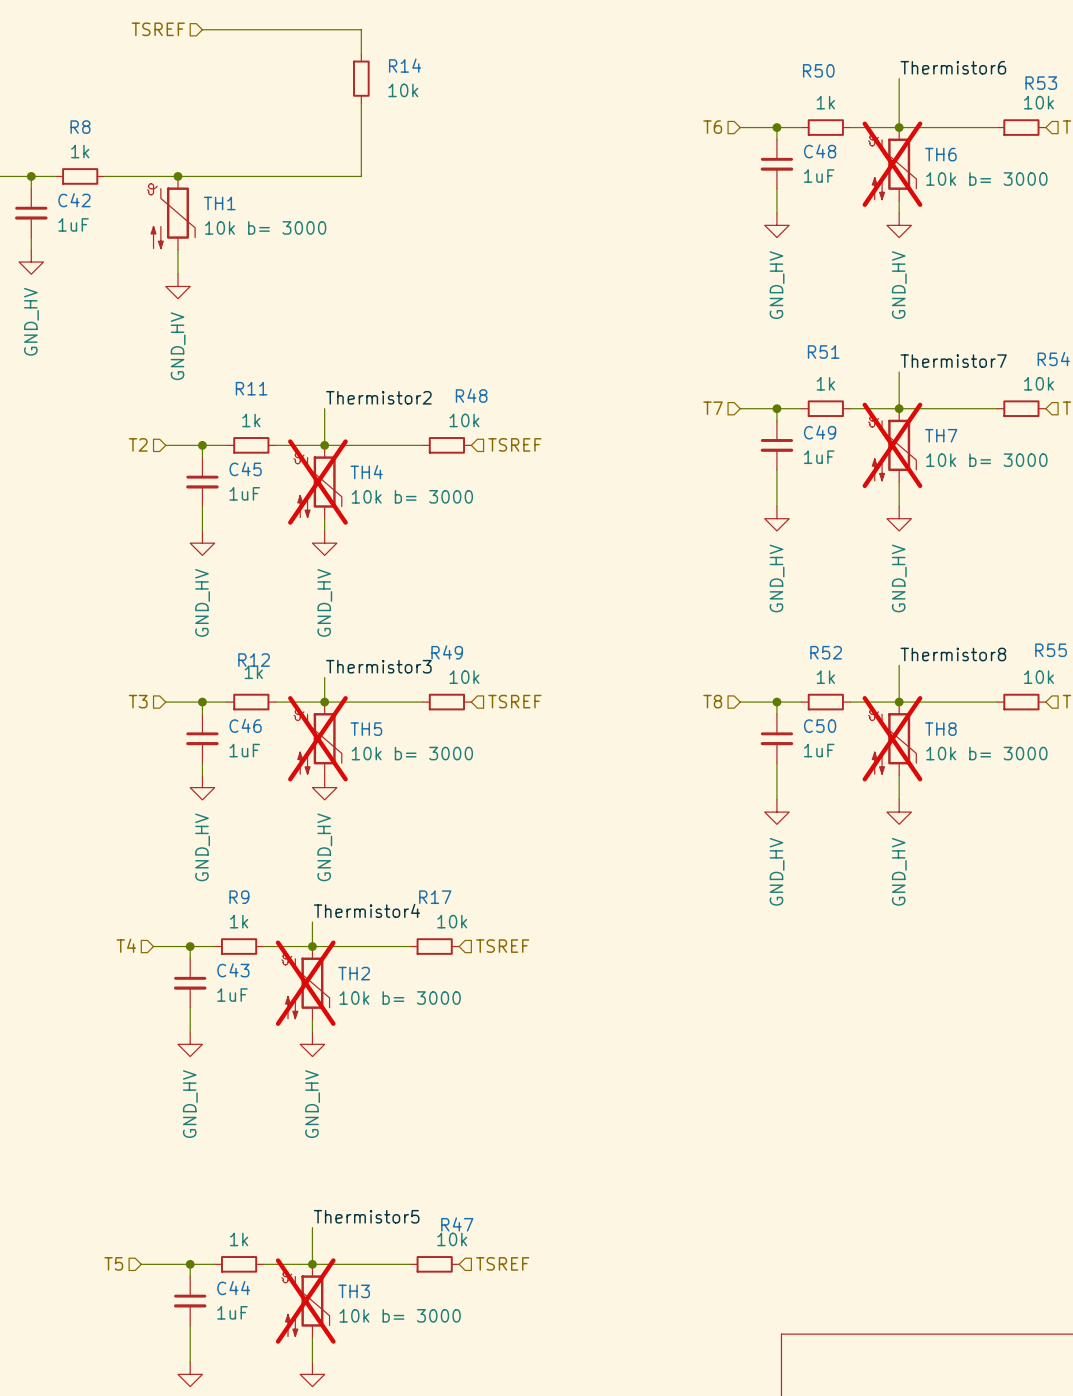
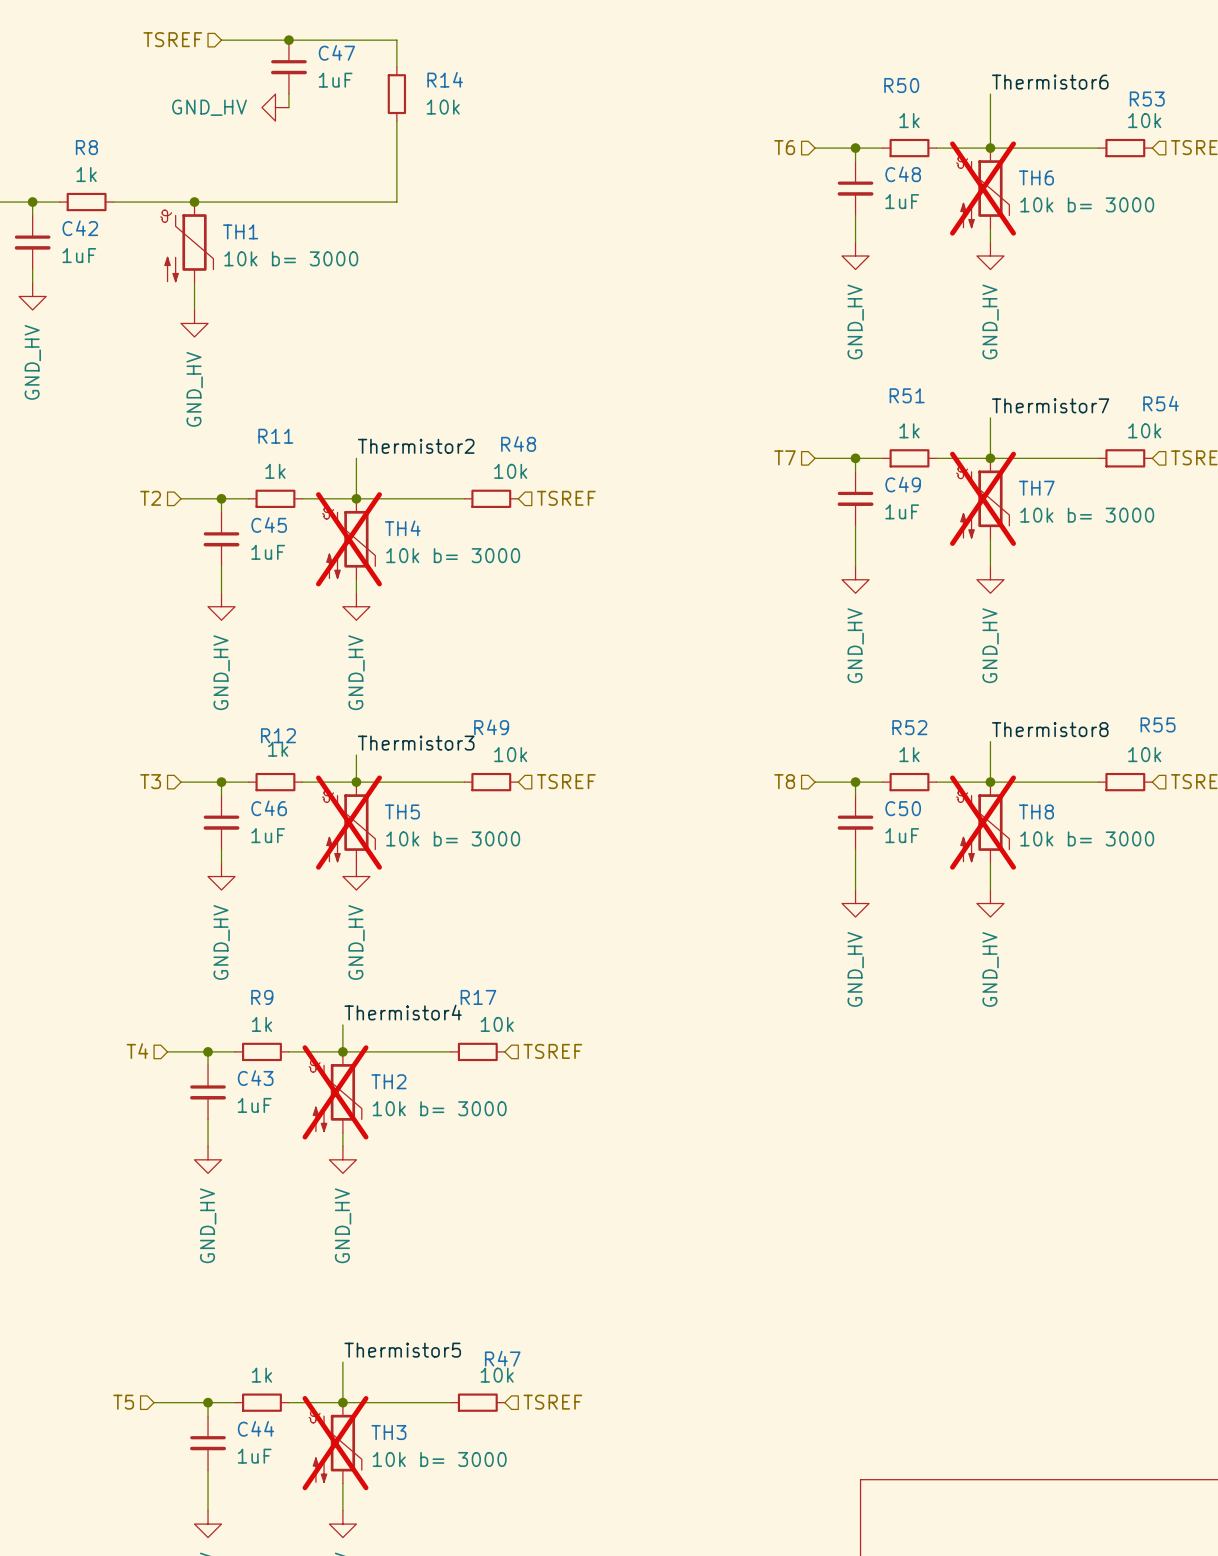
junction: none -> (288, 40)
C47: none -> 1uF (288, 67)
wire: none -> (288, 94) (288, 107)
power symbol: none -> GND_HV (275, 107)

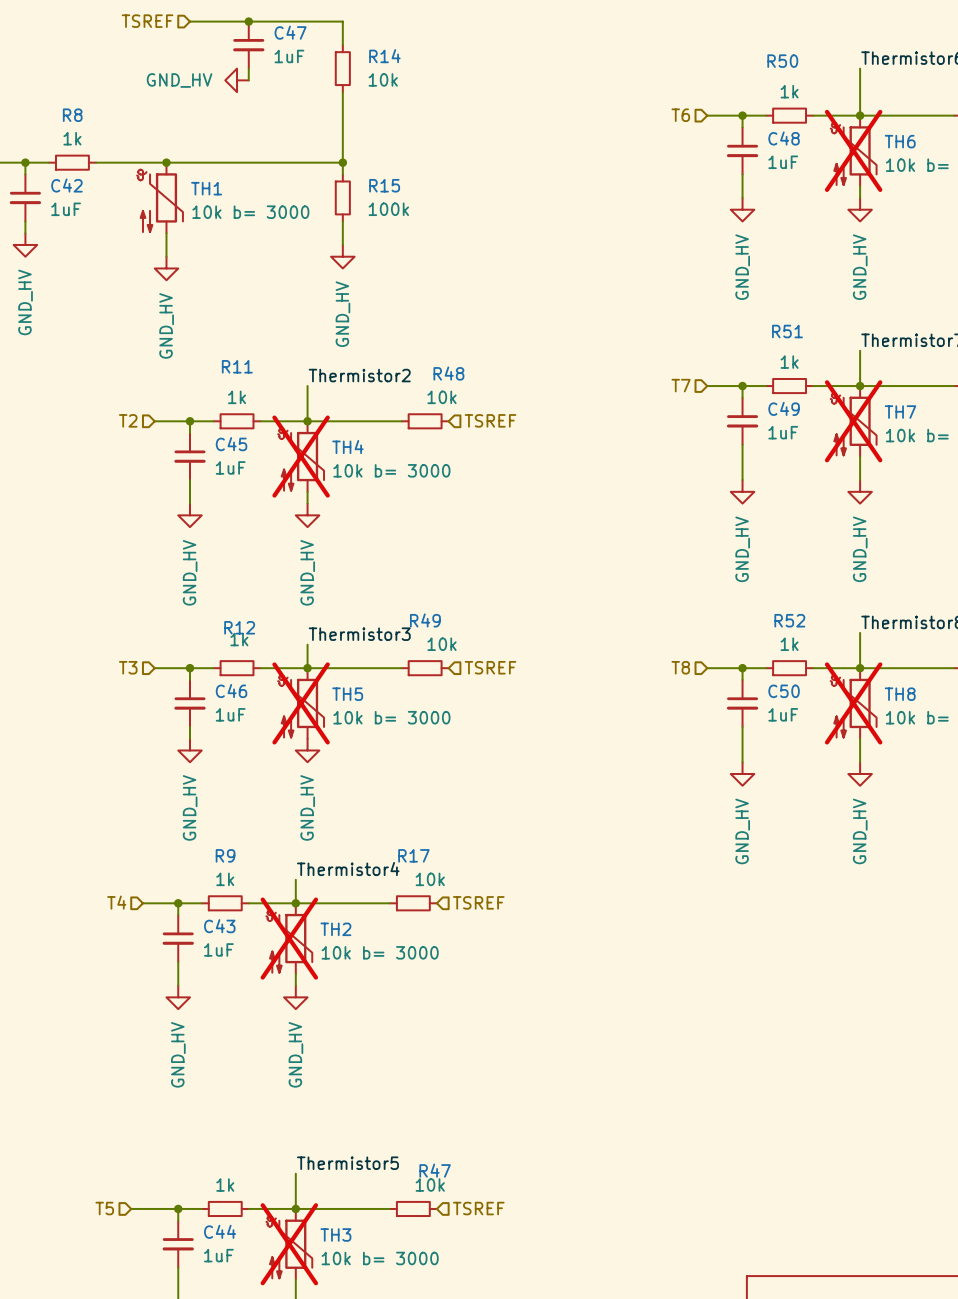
wire: none -> (342, 162) (342, 174)
junction: none -> (342, 162)
R15: none -> 100k (342, 197)
wire: none -> (342, 221) (342, 244)
power symbol: none -> GND_HV (342, 256)

